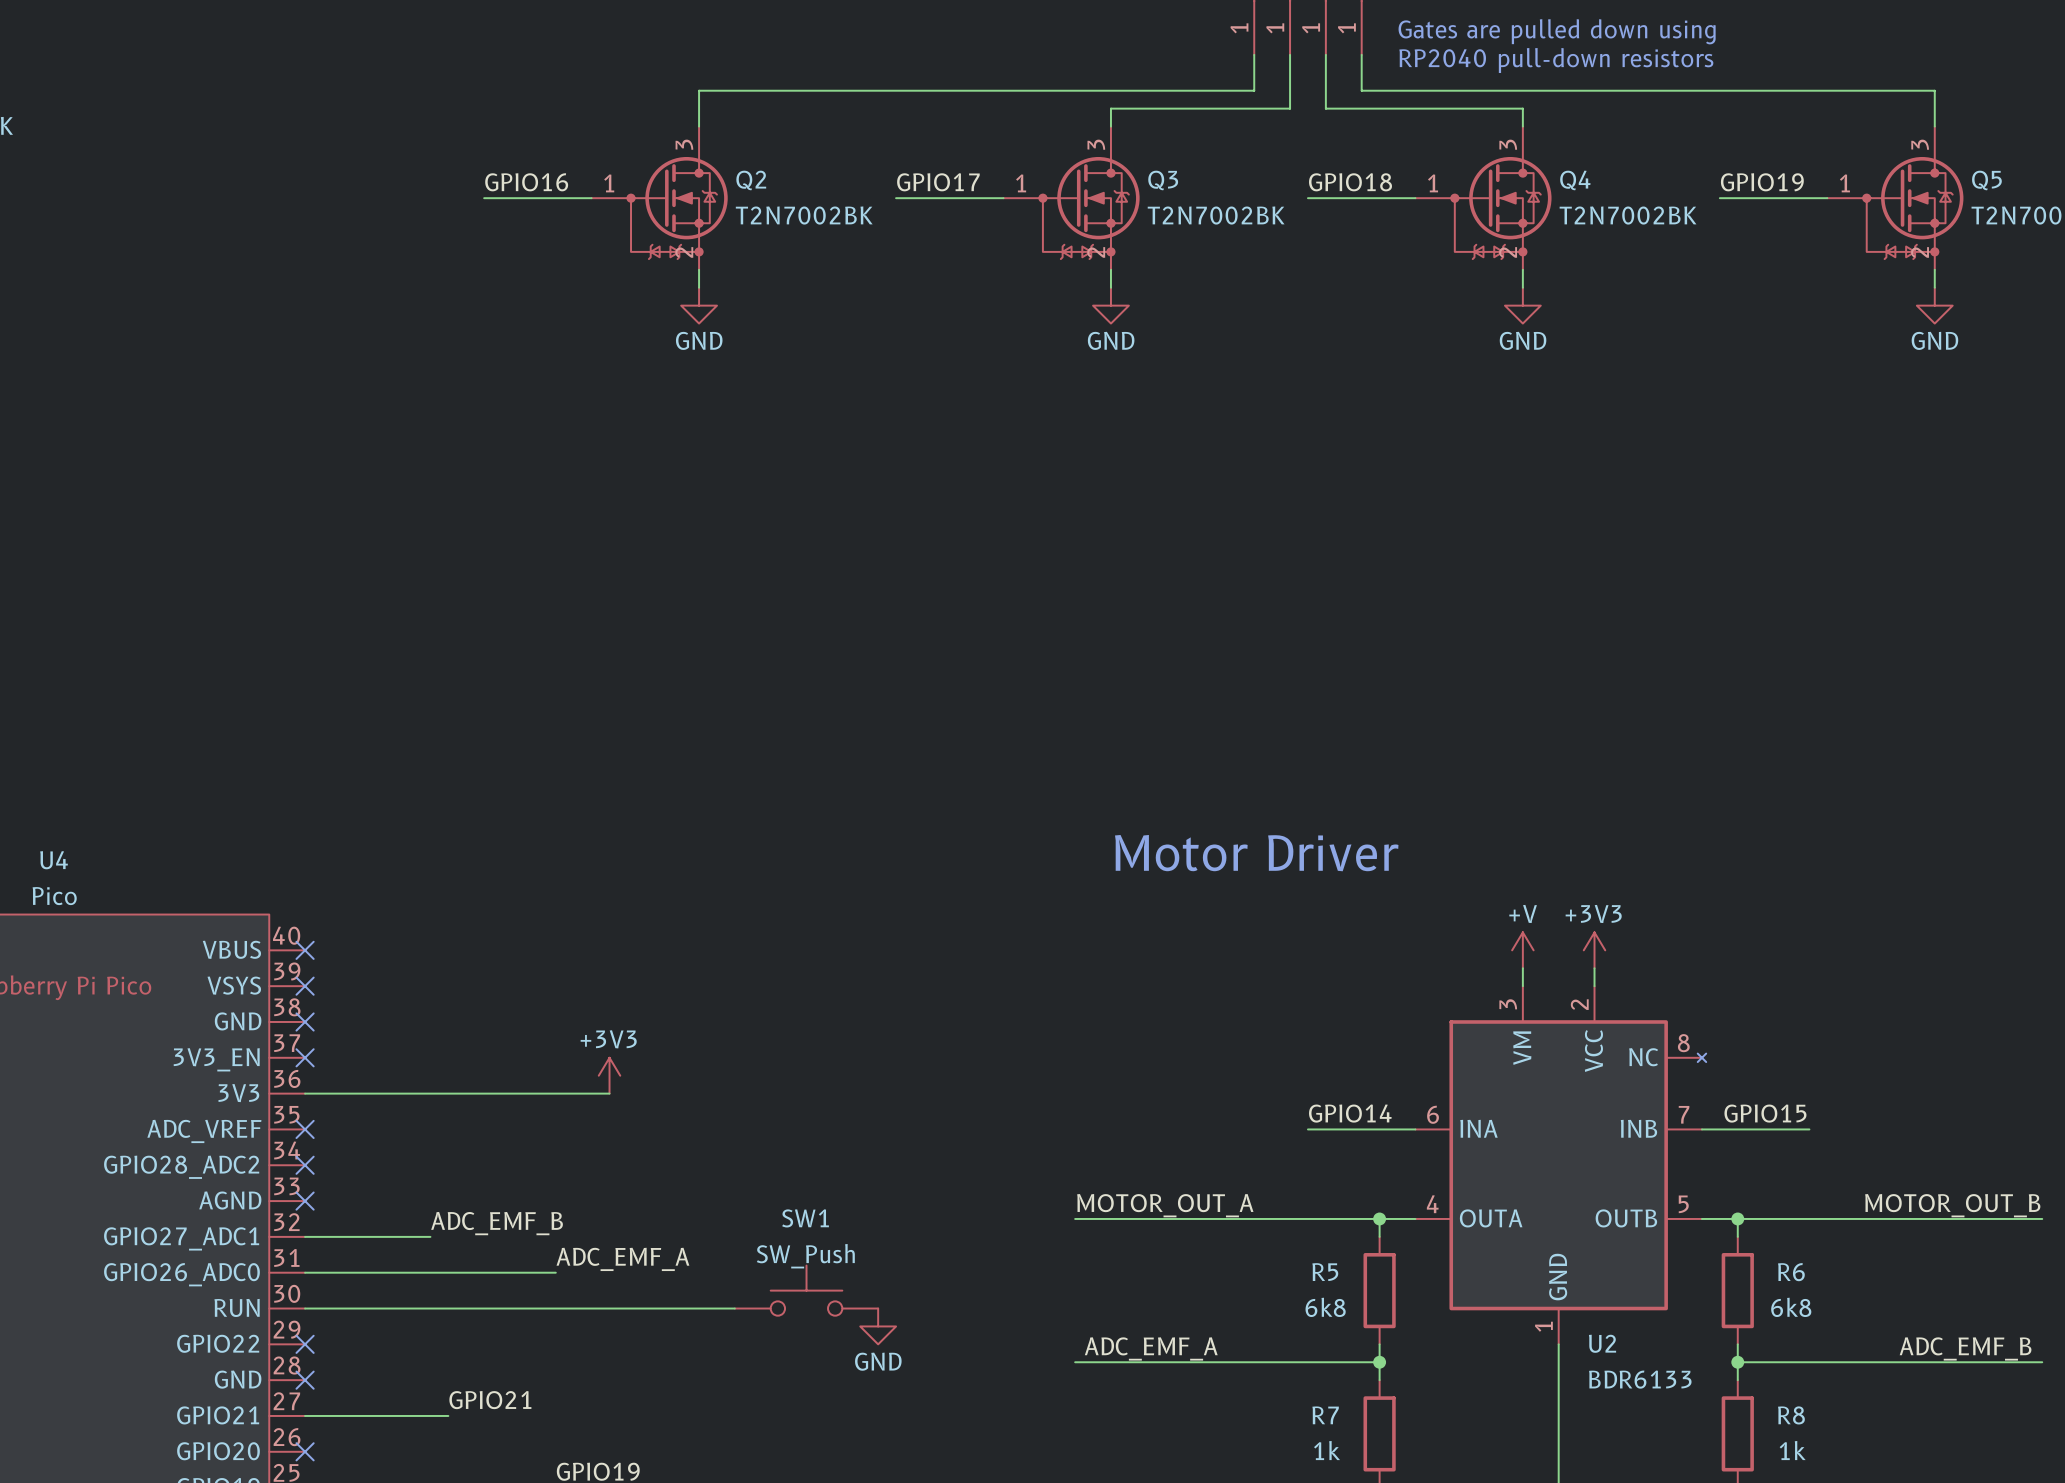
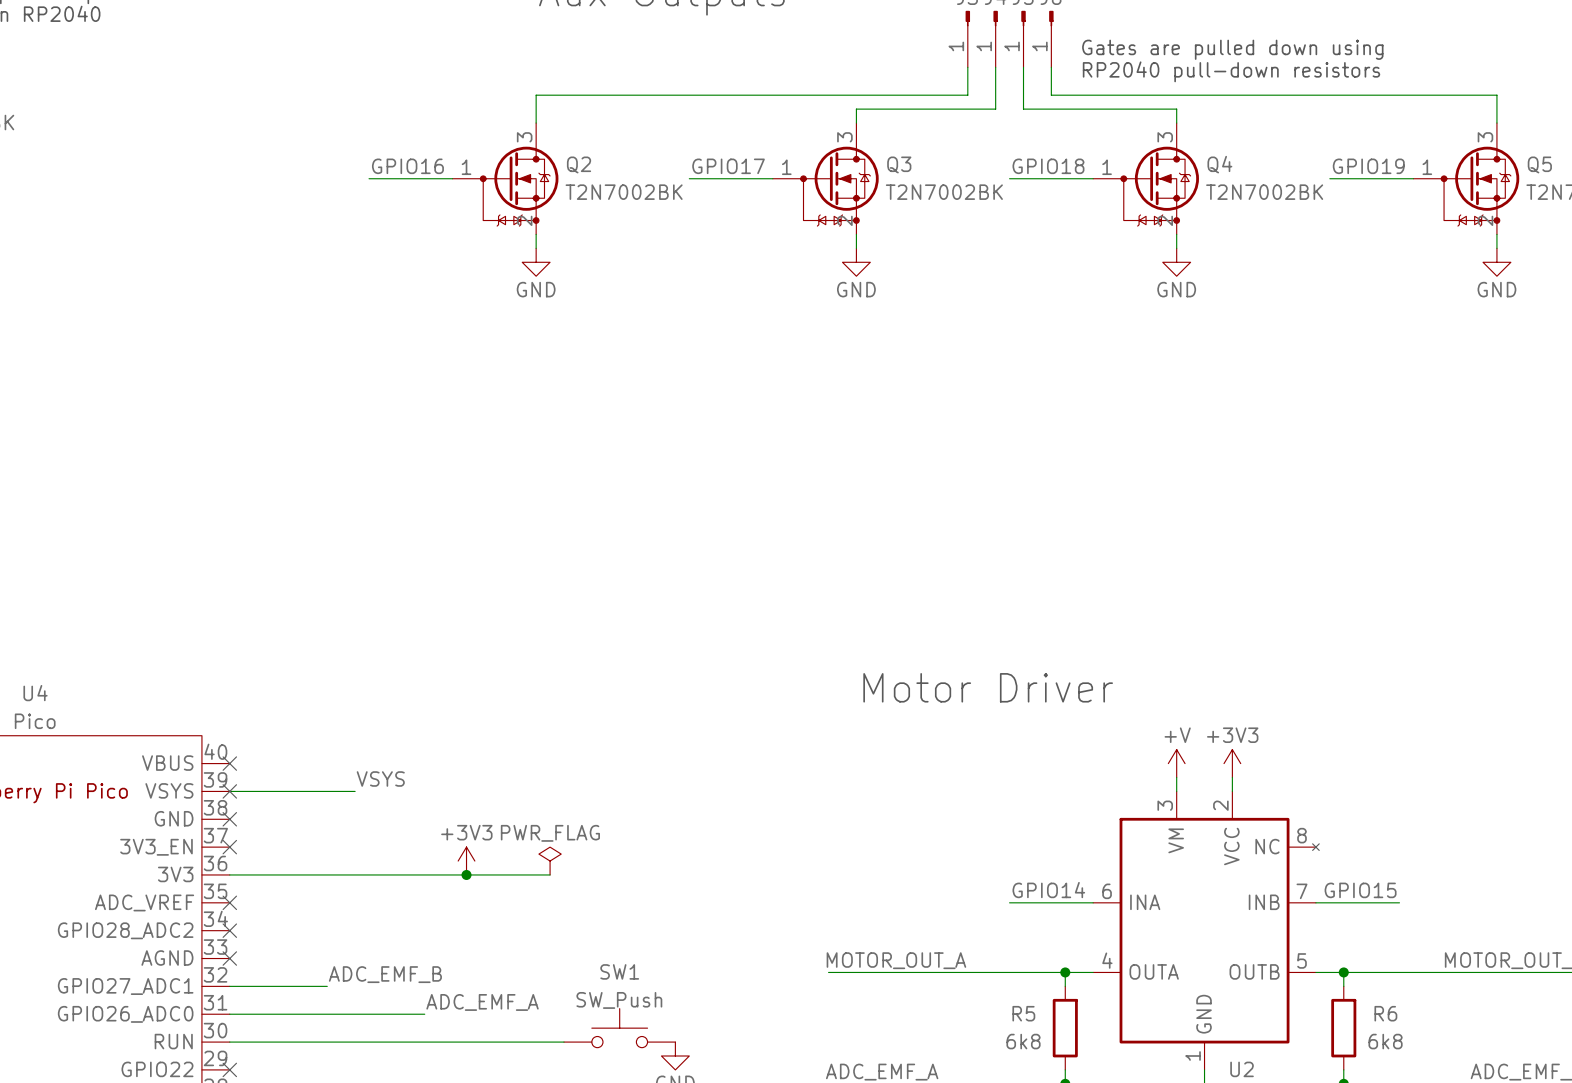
label: none -> VSYS (380, 779)
wire: none -> (229, 791) (355, 791)
power symbol: none -> PWR_FLAG (550, 861)
wire: none -> (466, 874) (550, 874)
junction: none -> (466, 874)

